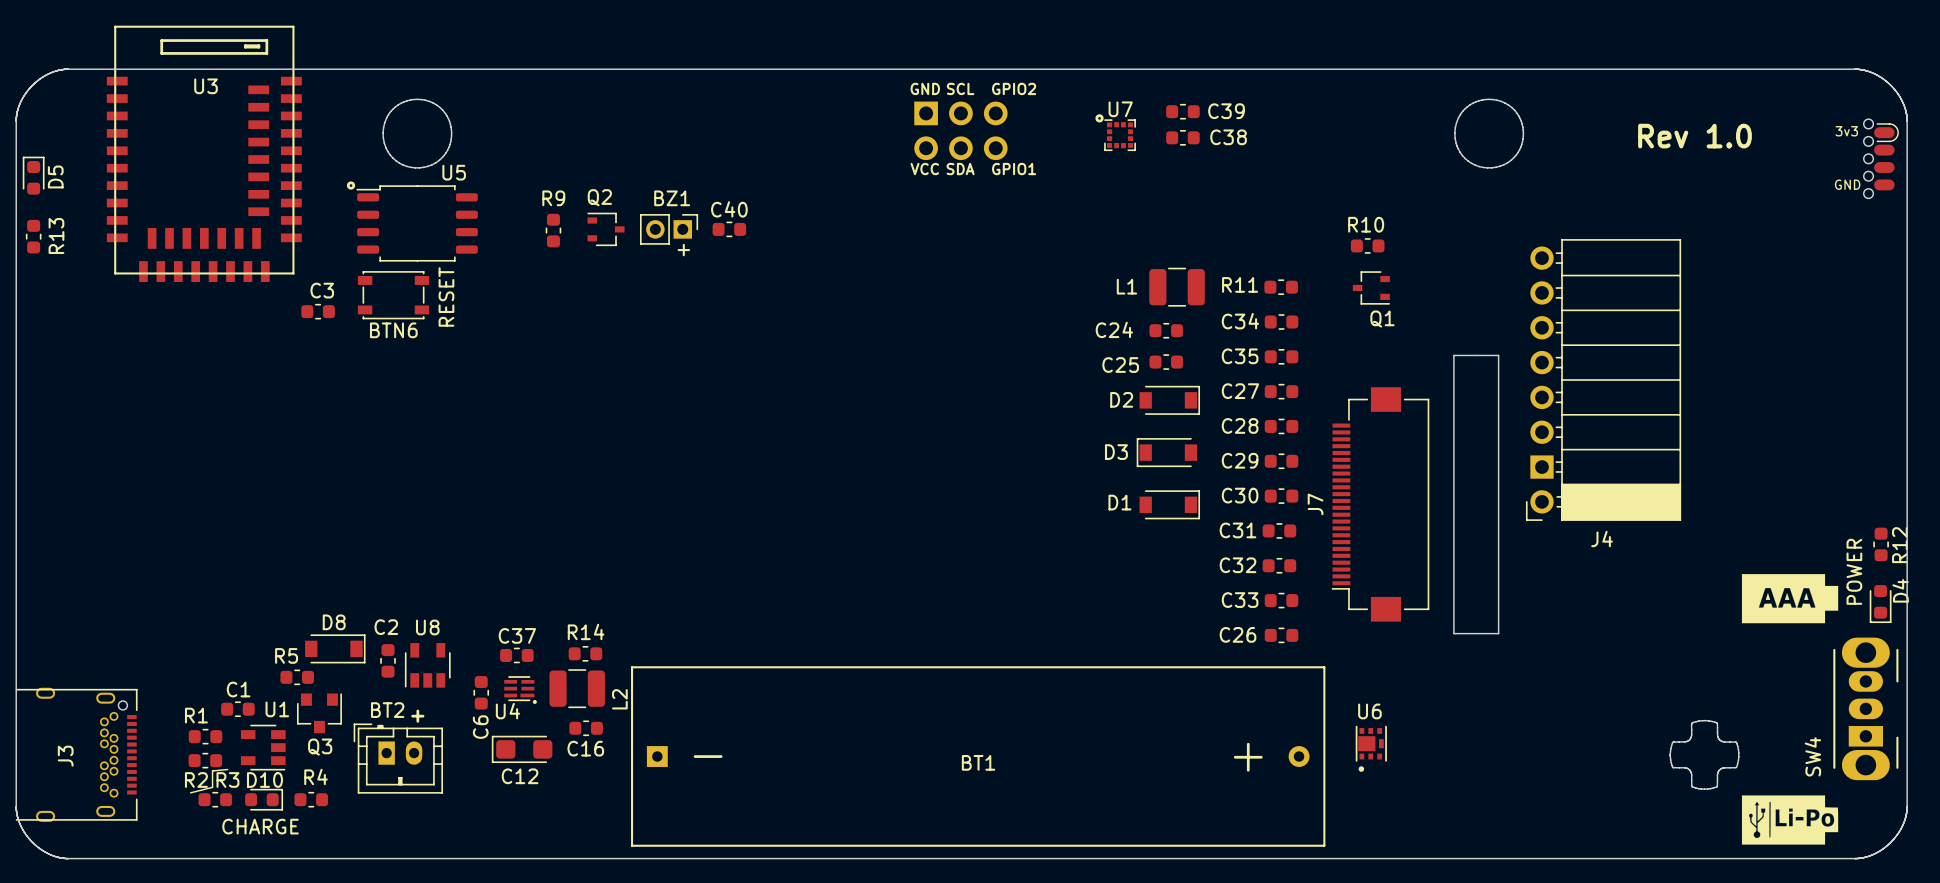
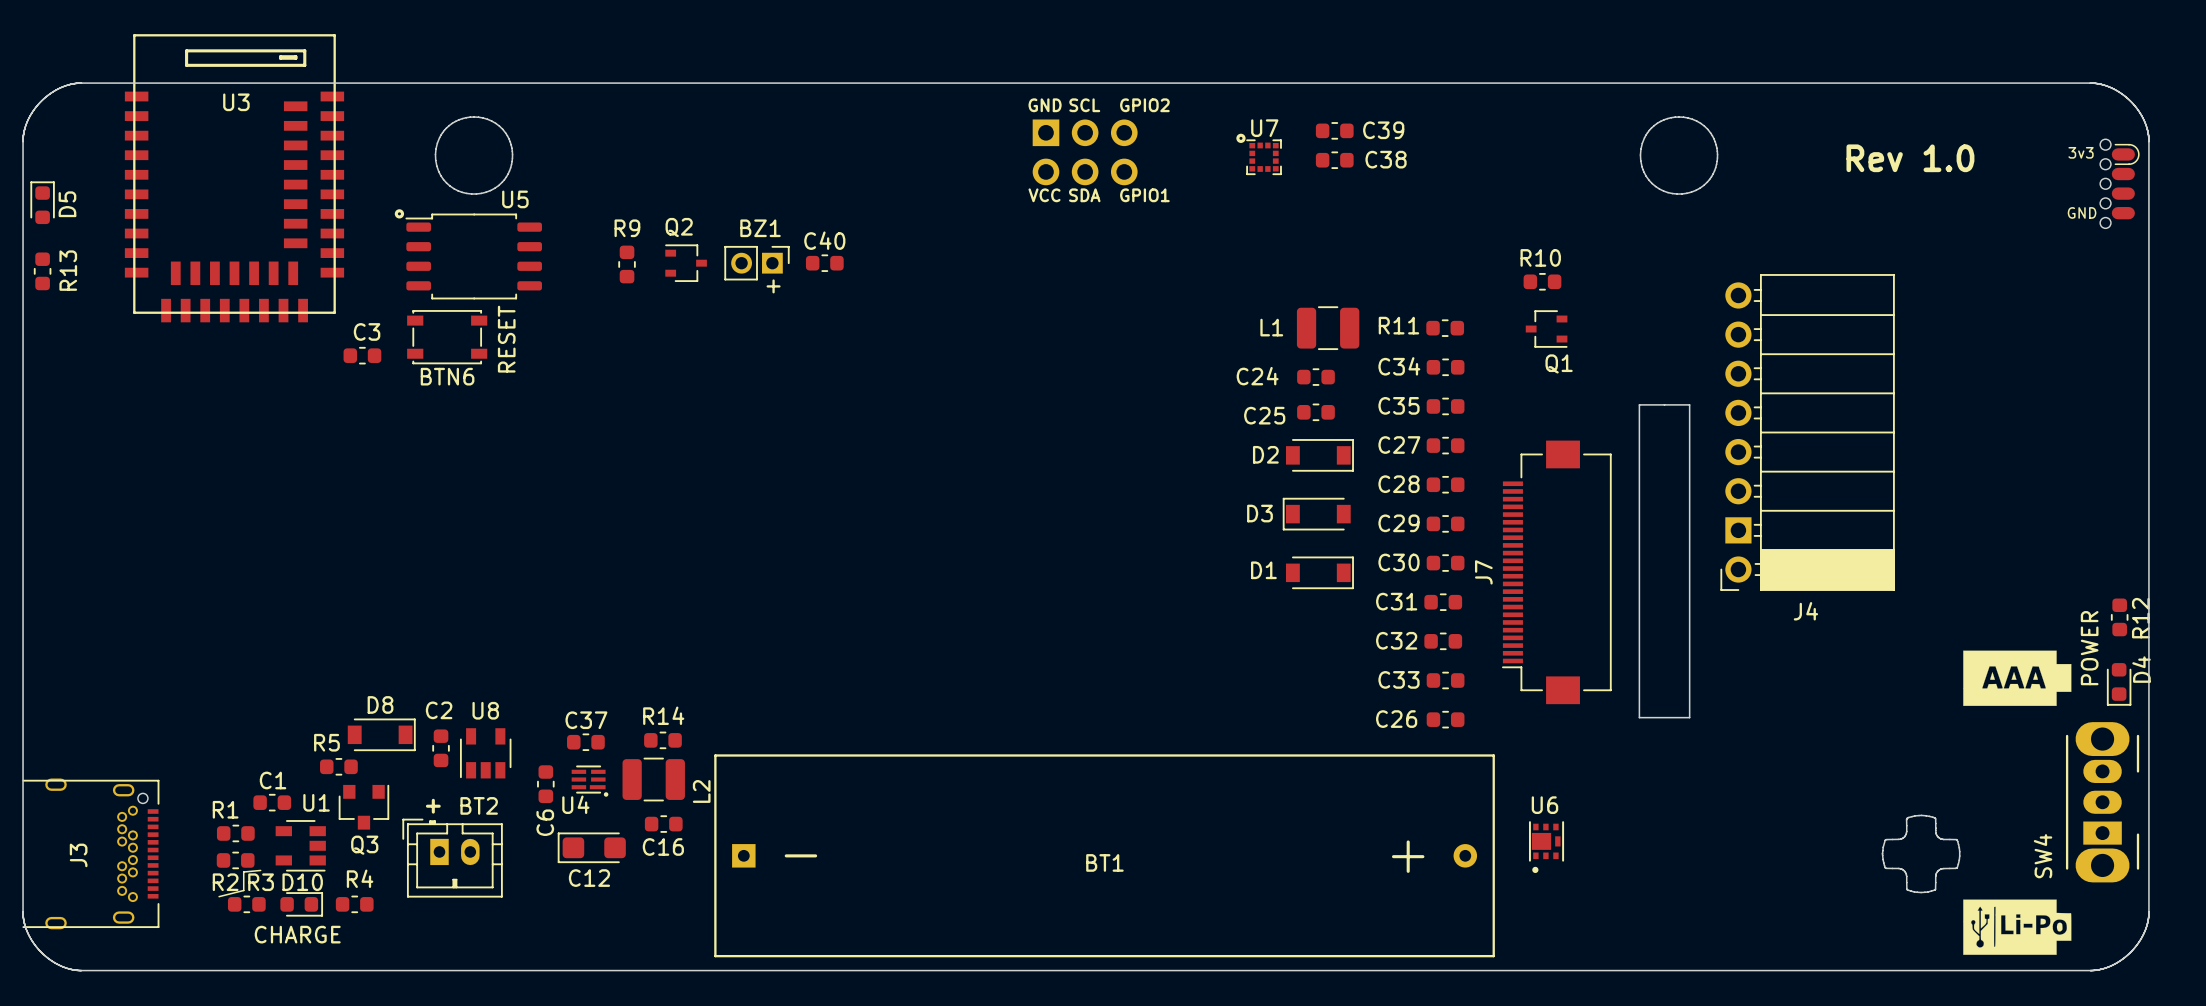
BT2 name position: BT2 (387, 710) -> BT2 (479, 805)
text position: + (417, 716) -> + (433, 806)

